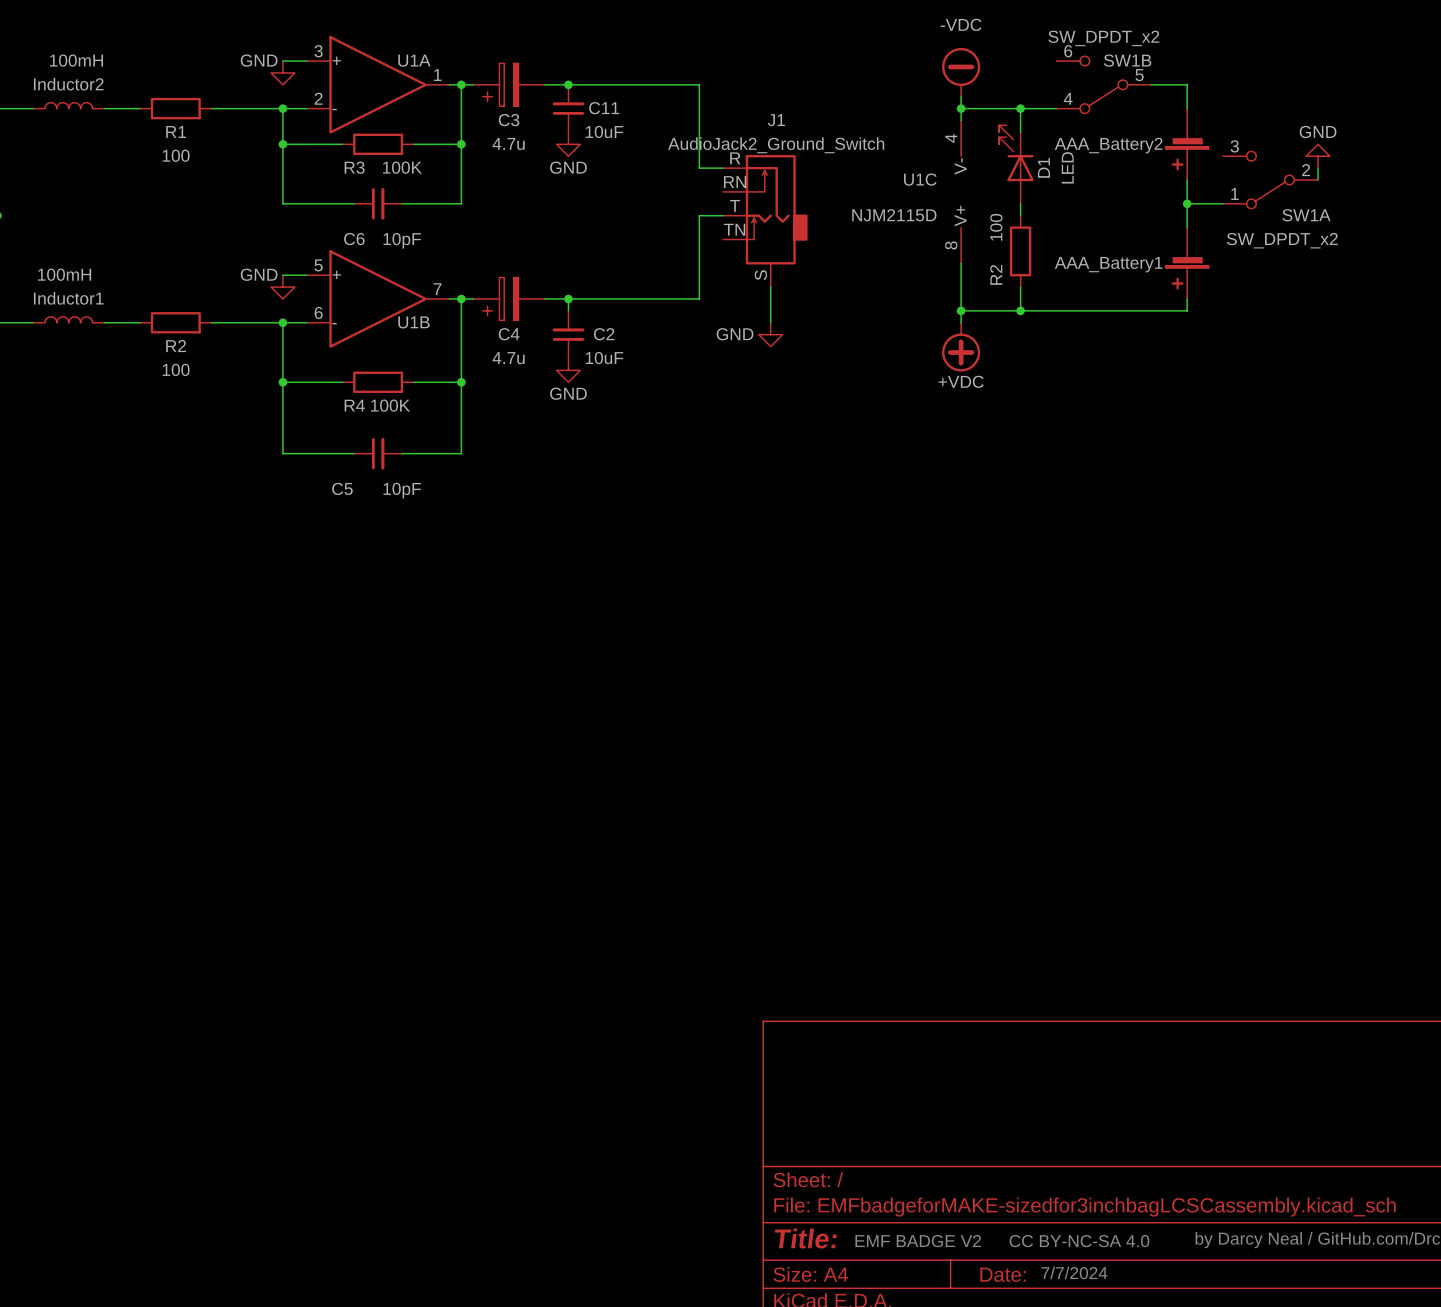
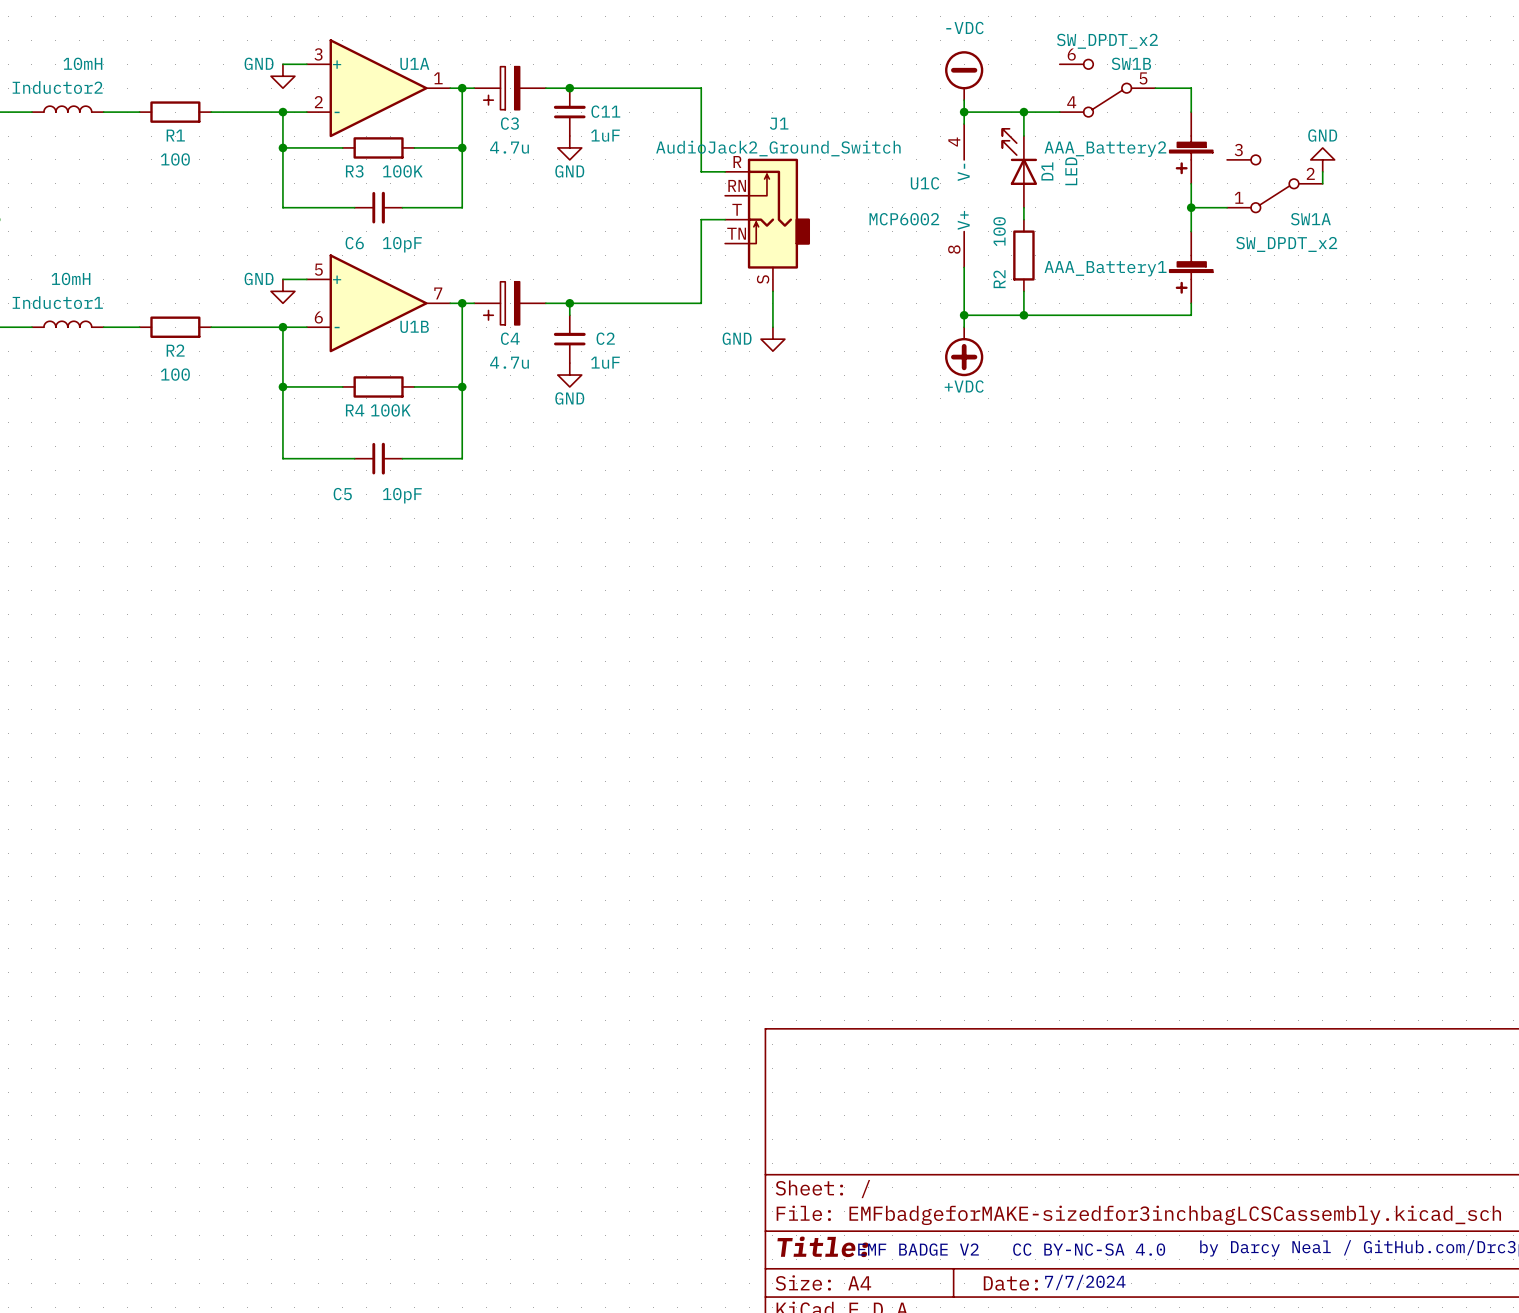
Inductor2 value: 100mH (76, 60) -> 10mH (82, 63)
C11 value: 10uF (604, 131) -> 1uF (605, 135)
U1C value: NJM2115D (894, 215) -> MCP6002 (904, 219)
Inductor1 value: 100mH (64, 274) -> 10mH (70, 278)
C2 value: 10uF (604, 358) -> 1uF (605, 362)

